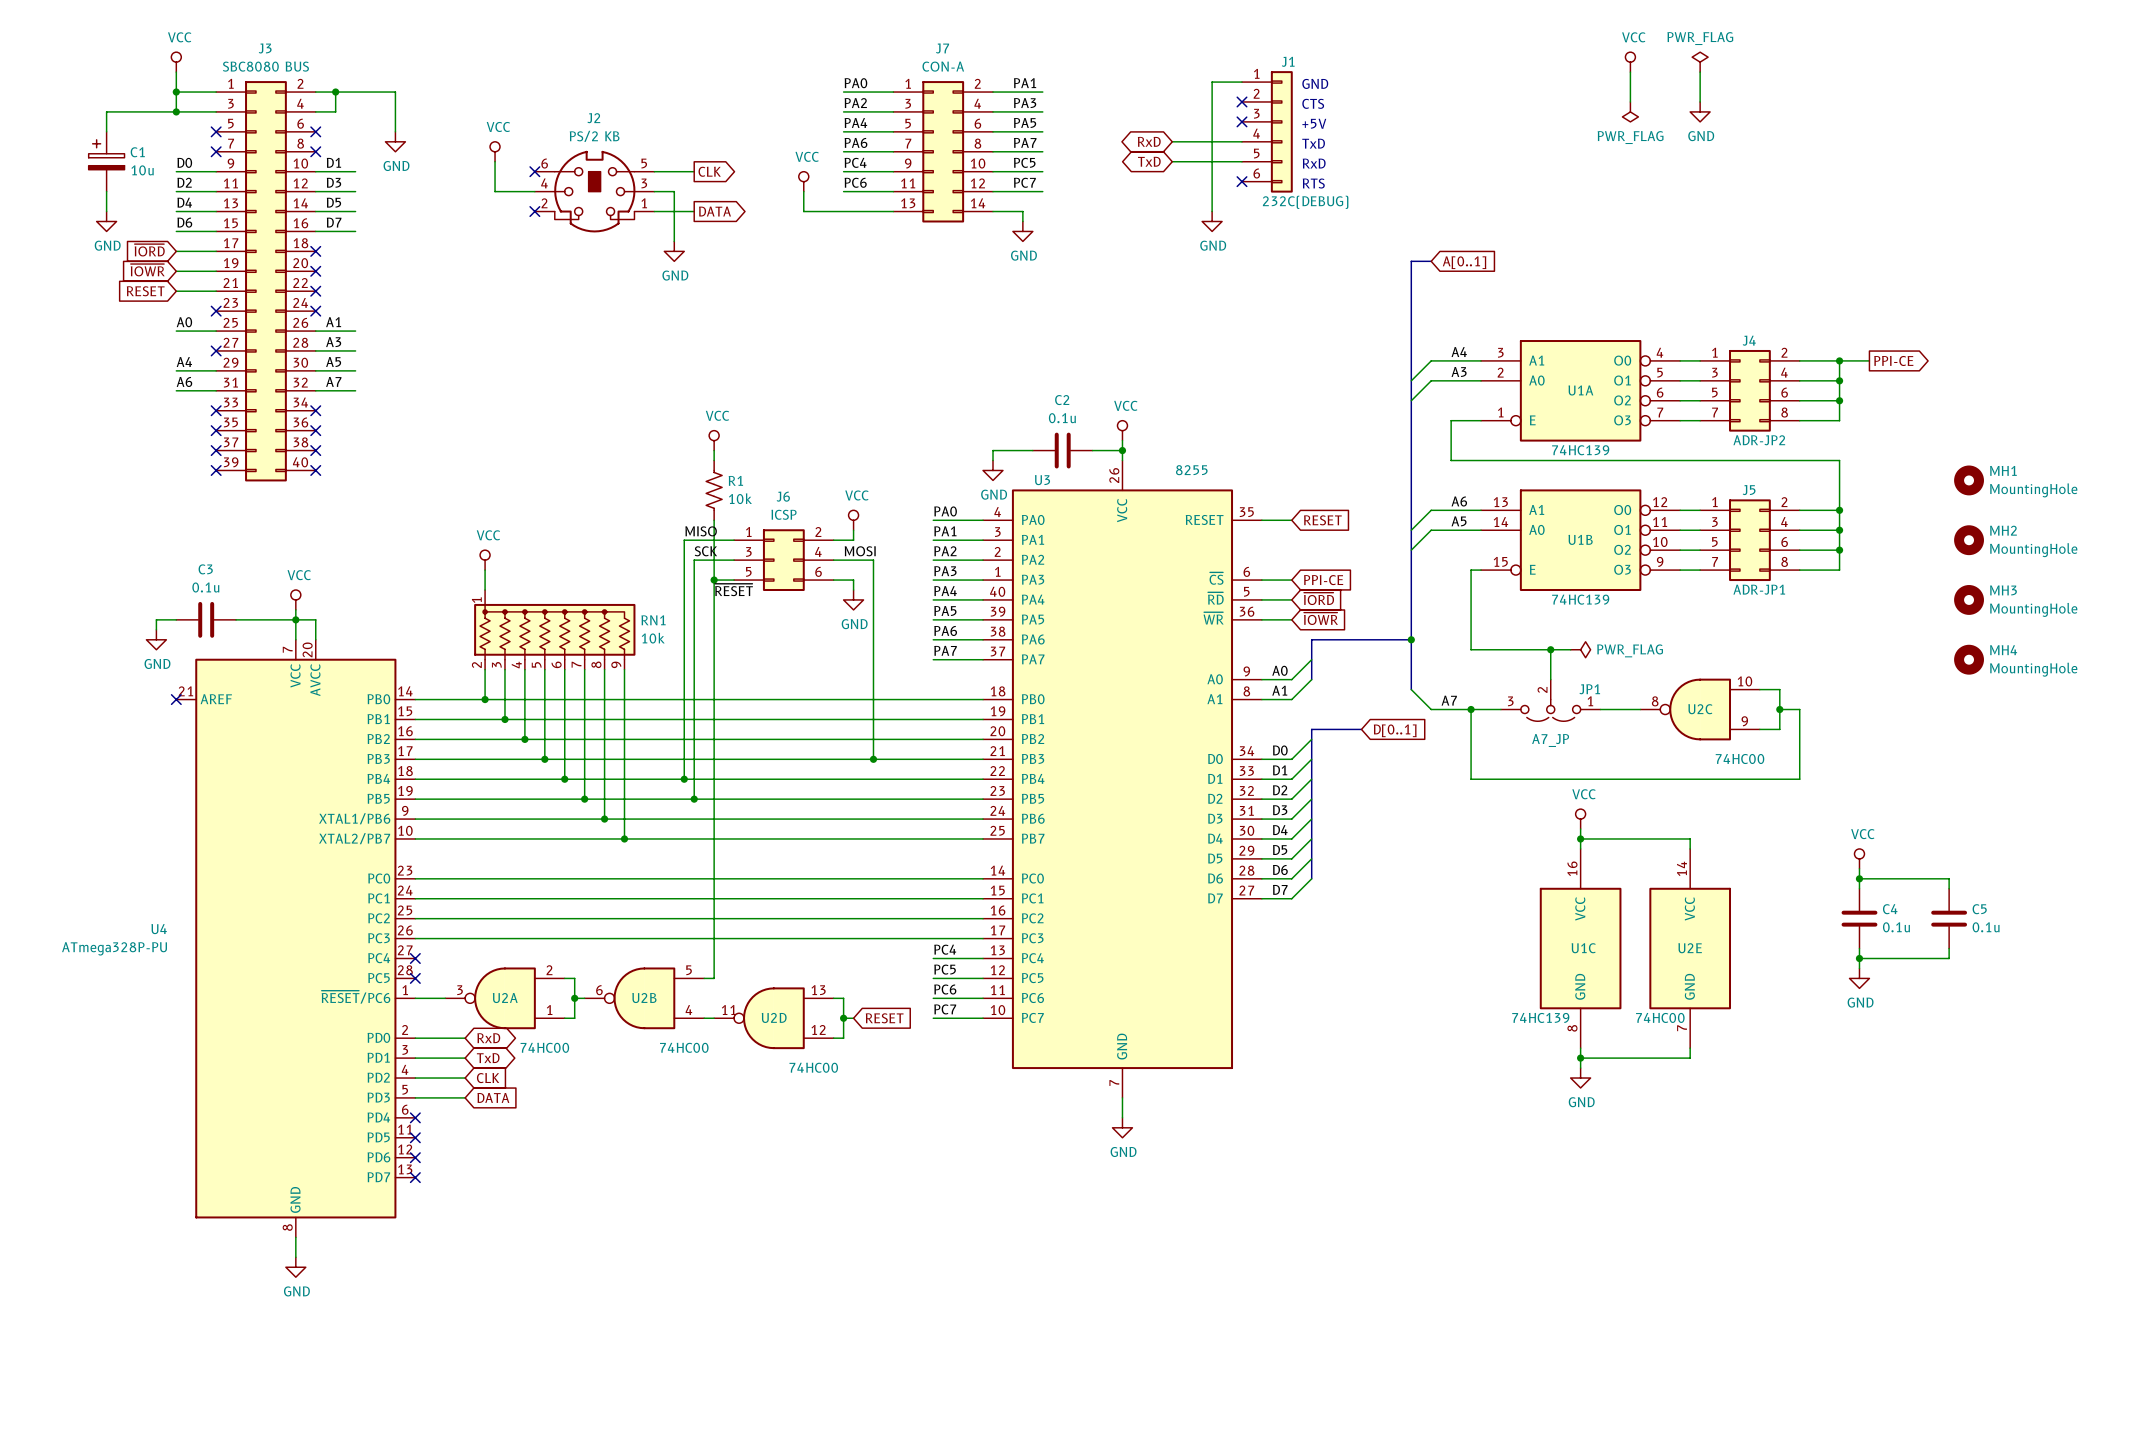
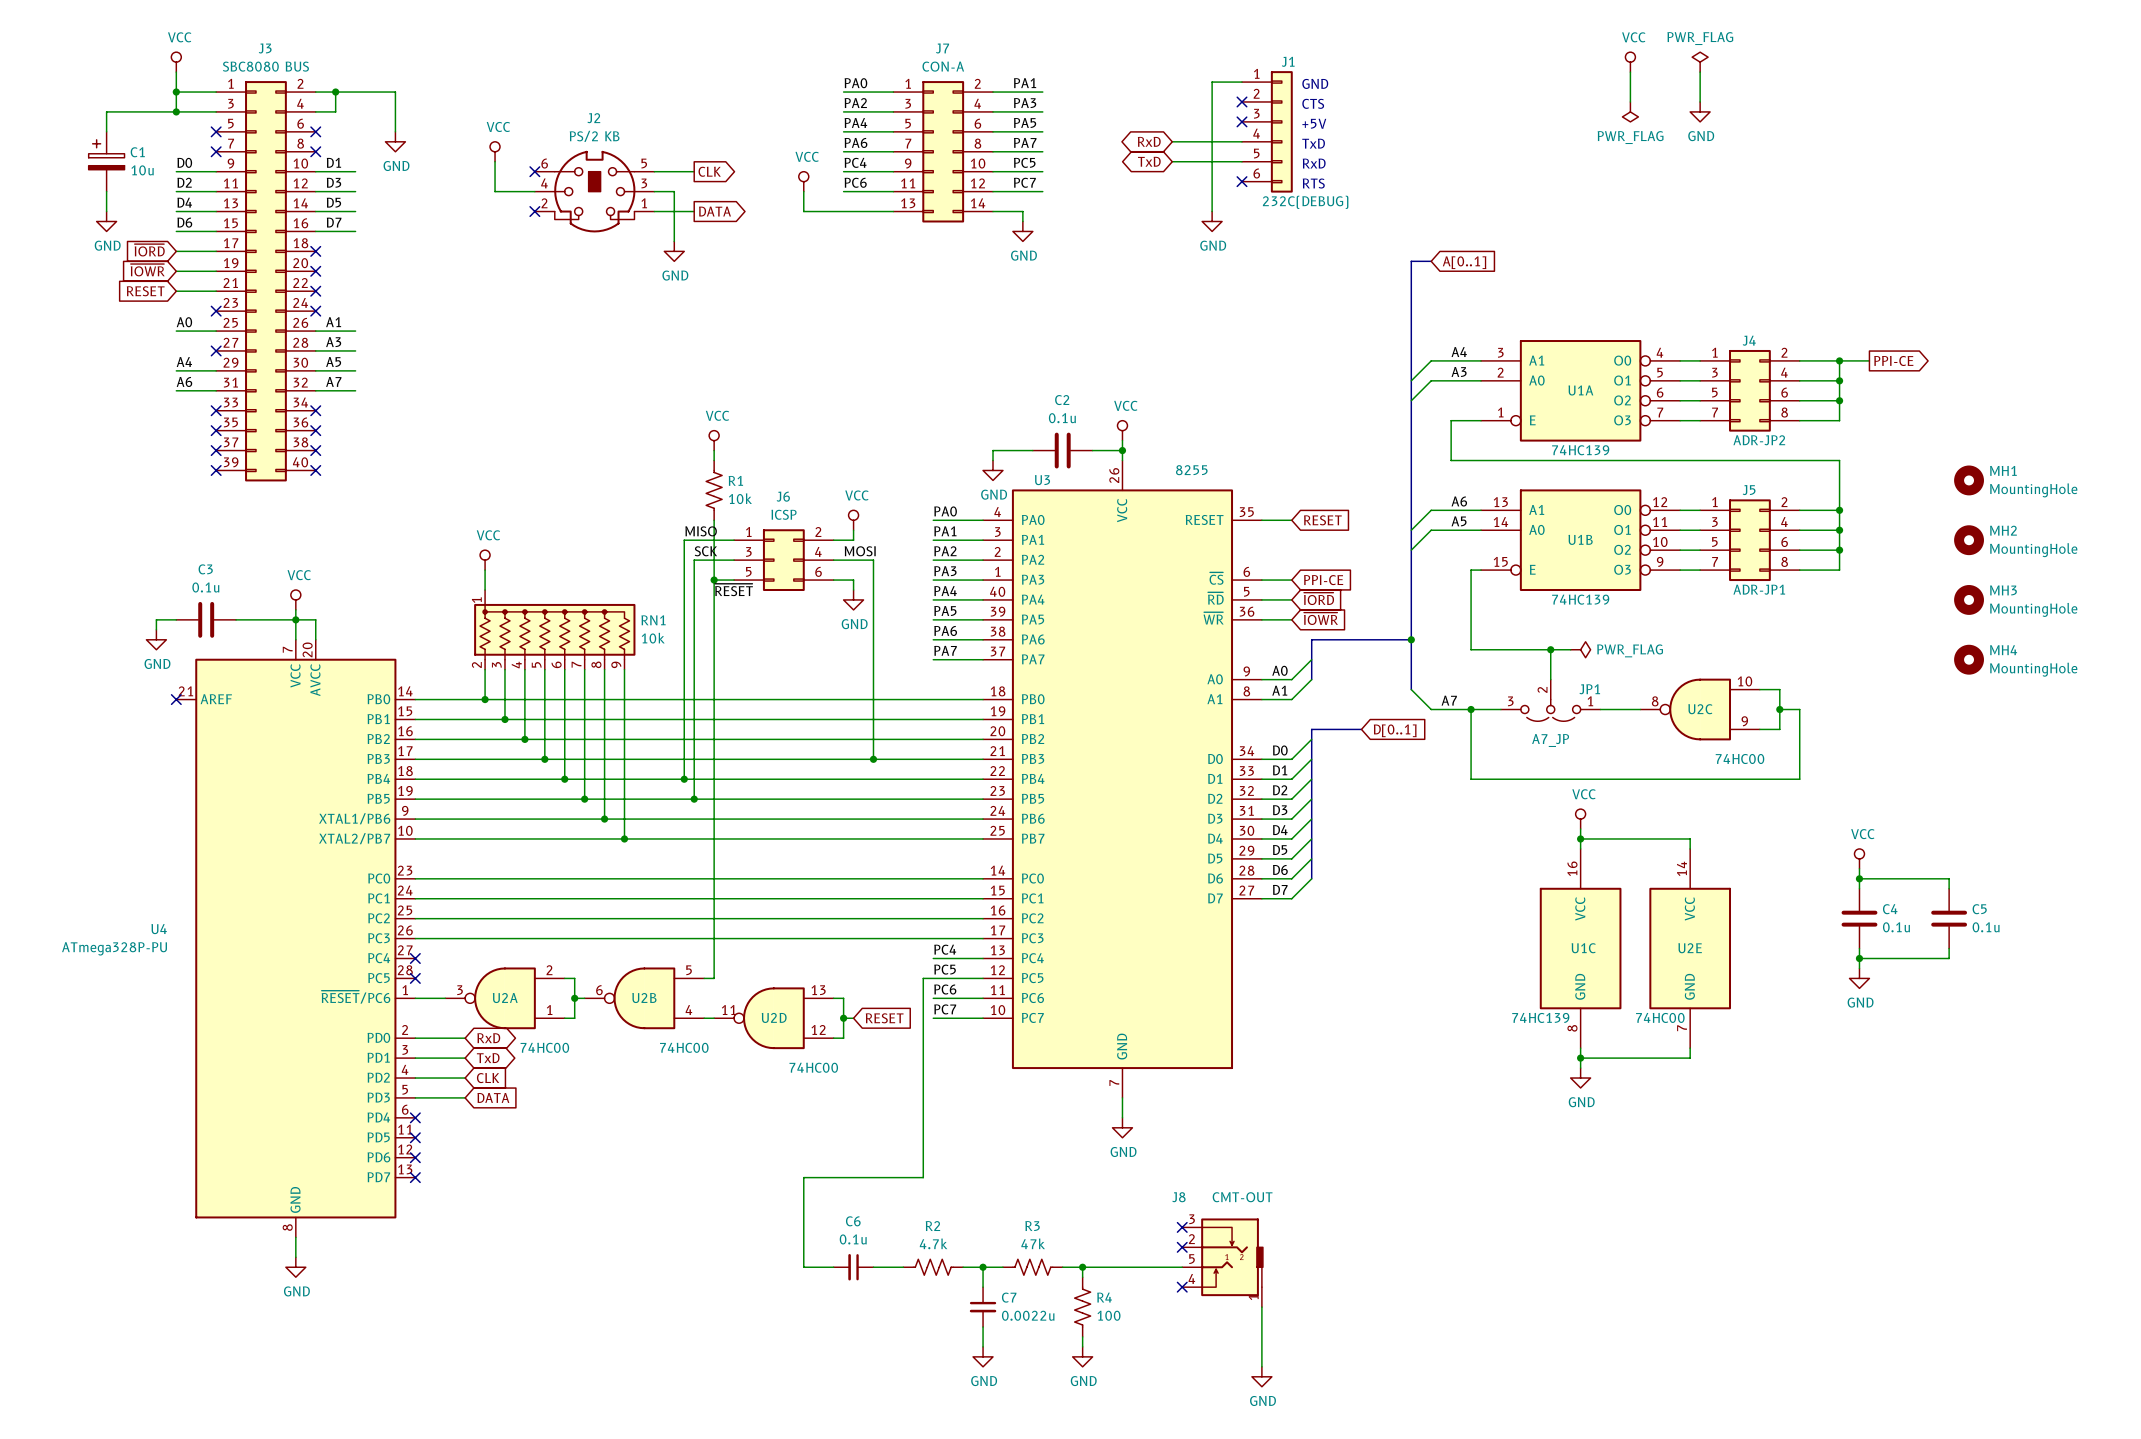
wire: none -> (933, 978) (923, 978) (923, 1177) (803, 1177) (803, 1267) (833, 1267)
no-connect mark: none -> (1182, 1227)
no-connect mark: none -> (1182, 1247)
J8: none -> CMT-OUT (1222, 1262)
C6: none -> 0.1u (853, 1267)
wire: none -> (873, 1267) (903, 1267)
R2: none -> 4.7k (933, 1267)
wire: none -> (963, 1267) (1002, 1267)
wire: none -> (983, 1267) (983, 1287)
junction: none -> (983, 1267)
R3: none -> 47k (1032, 1267)
wire: none -> (1062, 1267) (1182, 1267)
wire: none -> (1082, 1267) (1082, 1277)
junction: none -> (1082, 1267)
no-connect mark: none -> (1182, 1287)
C7: none -> 0.0022u (983, 1307)
R4: none -> 100 (1082, 1307)
wire: none -> (1261, 1307) (1261, 1366)
wire: none -> (983, 1327) (983, 1346)
wire: none -> (1082, 1336) (1082, 1346)
power symbol: none -> GND (983, 1356)
power symbol: none -> GND (1082, 1356)
power symbol: none -> GND (1261, 1376)

